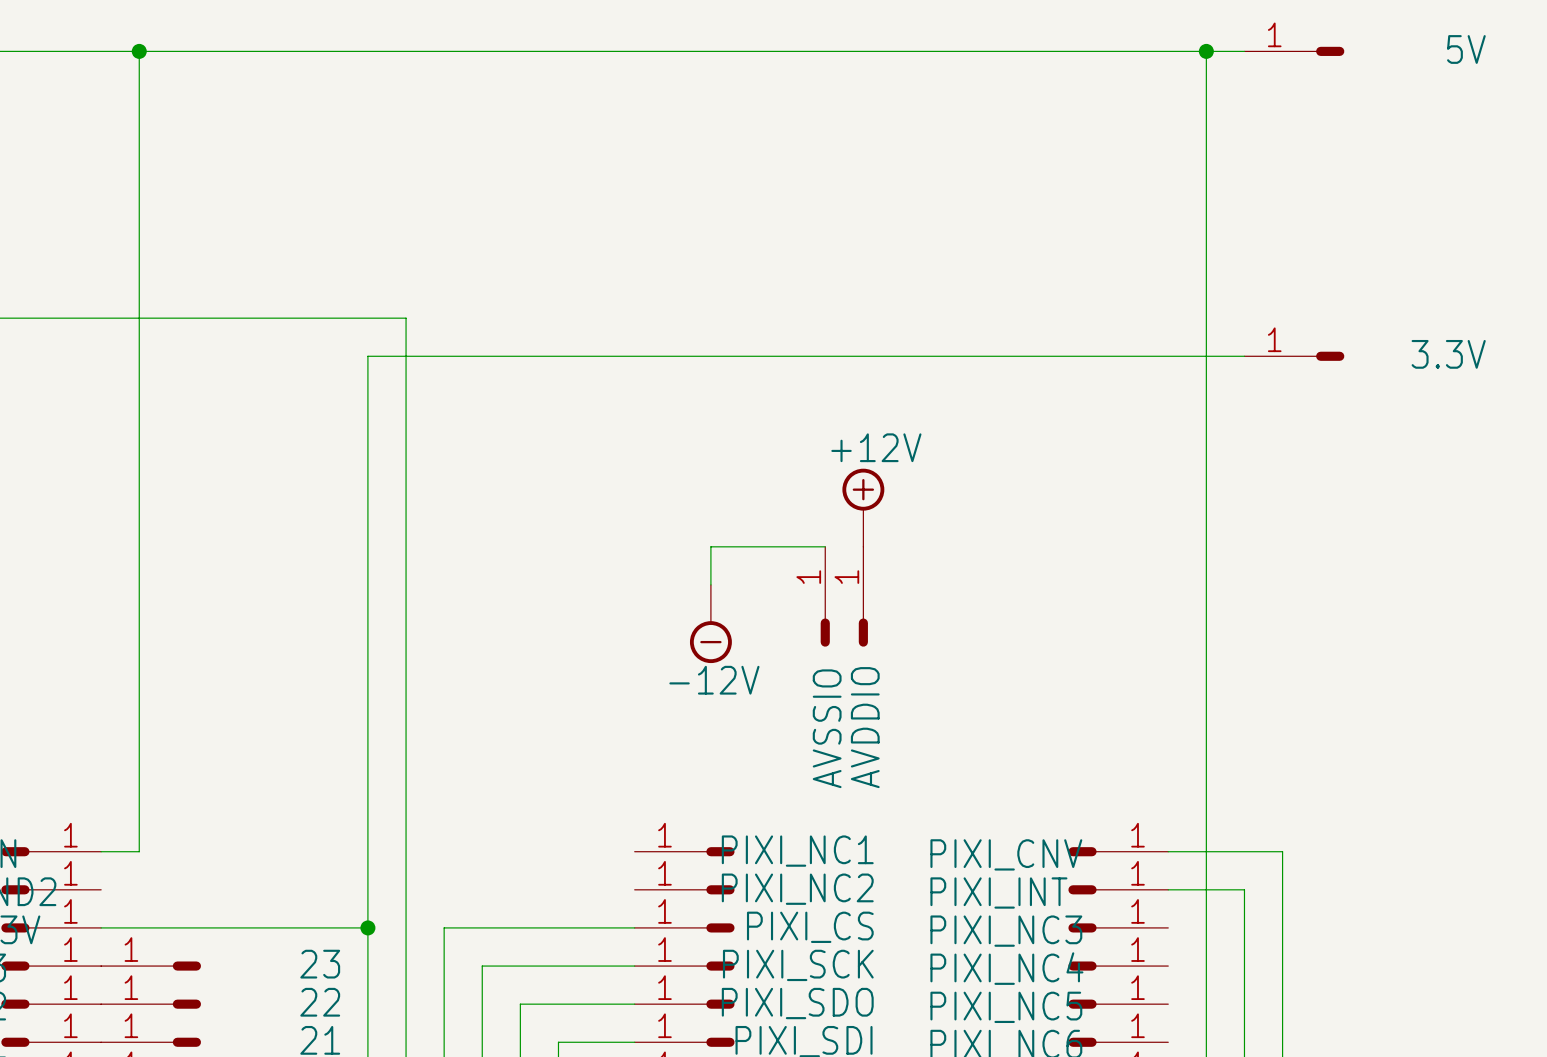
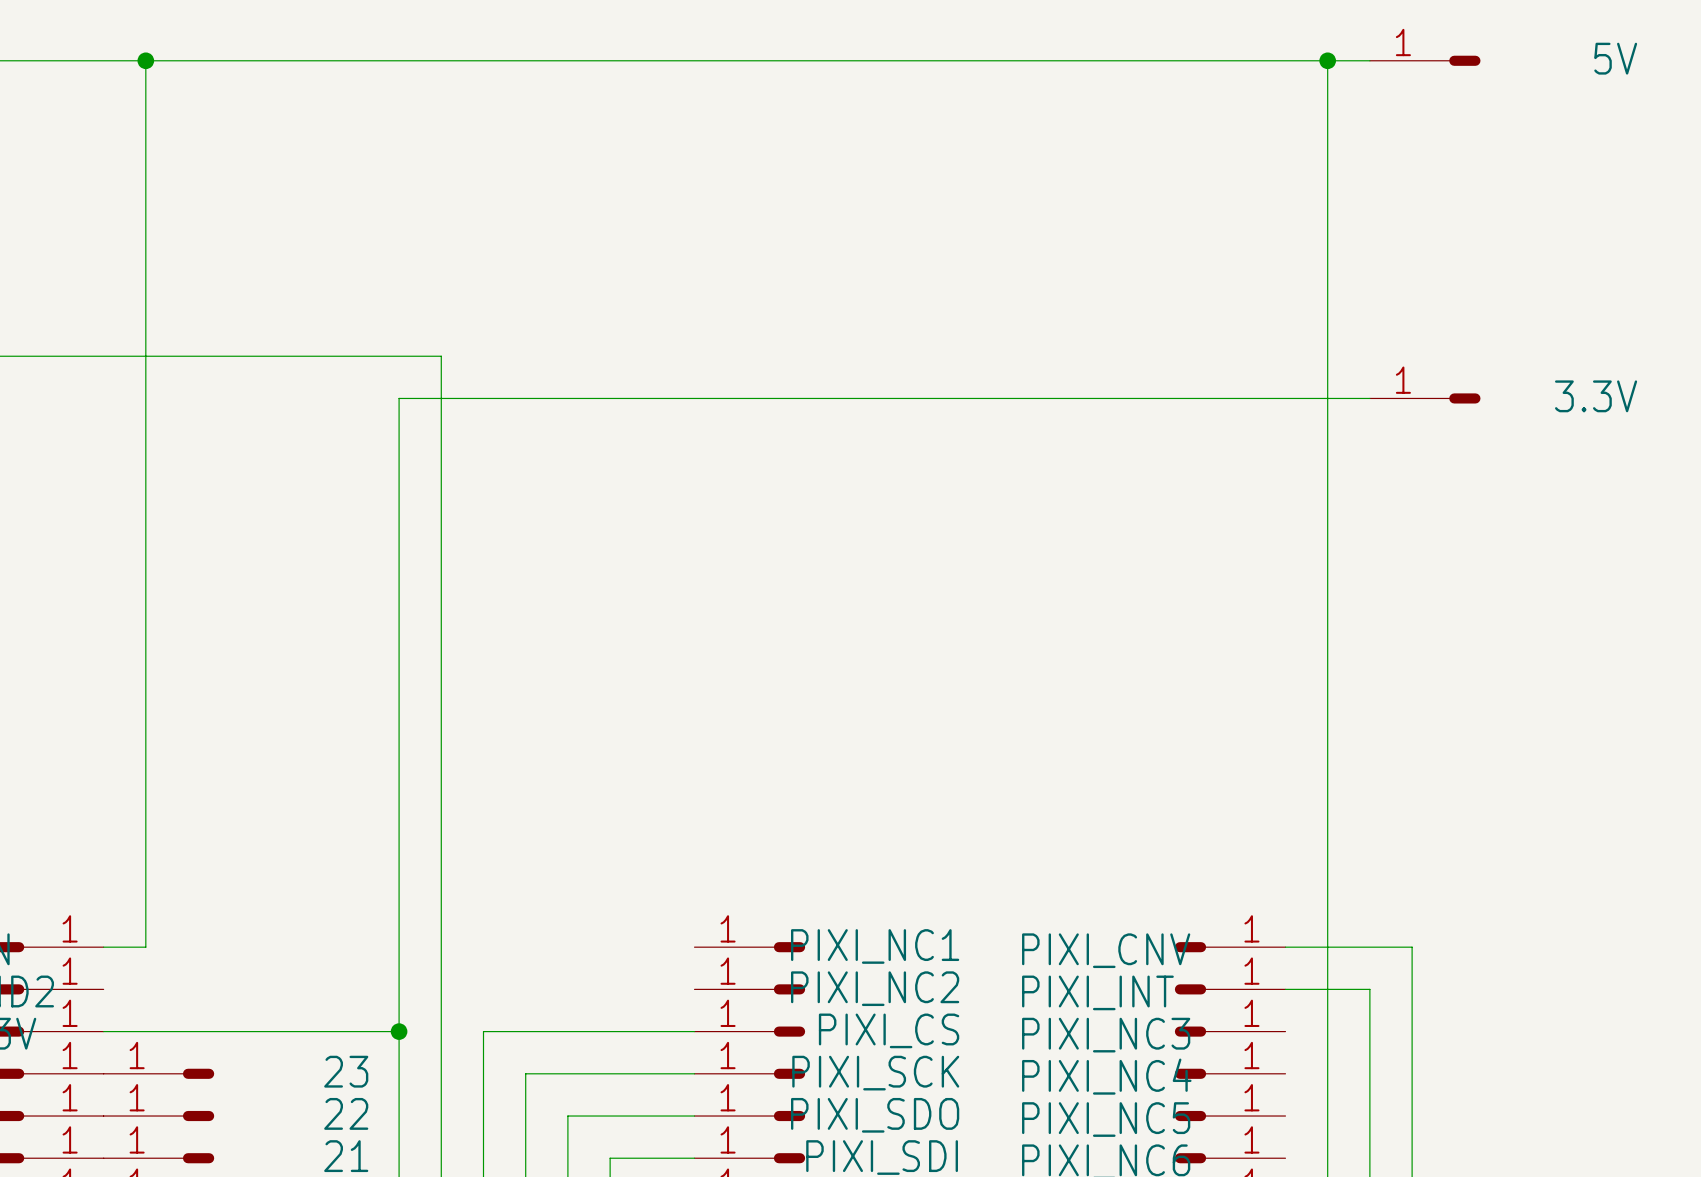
power symbol: +12V (863, 507) -> none
wire: (825, 546) (710, 546) (710, 584) -> none
AVSSIO: (825, 596) -> none
AVDDIO: (863, 596) -> none
power symbol: -12V (710, 624) -> none

